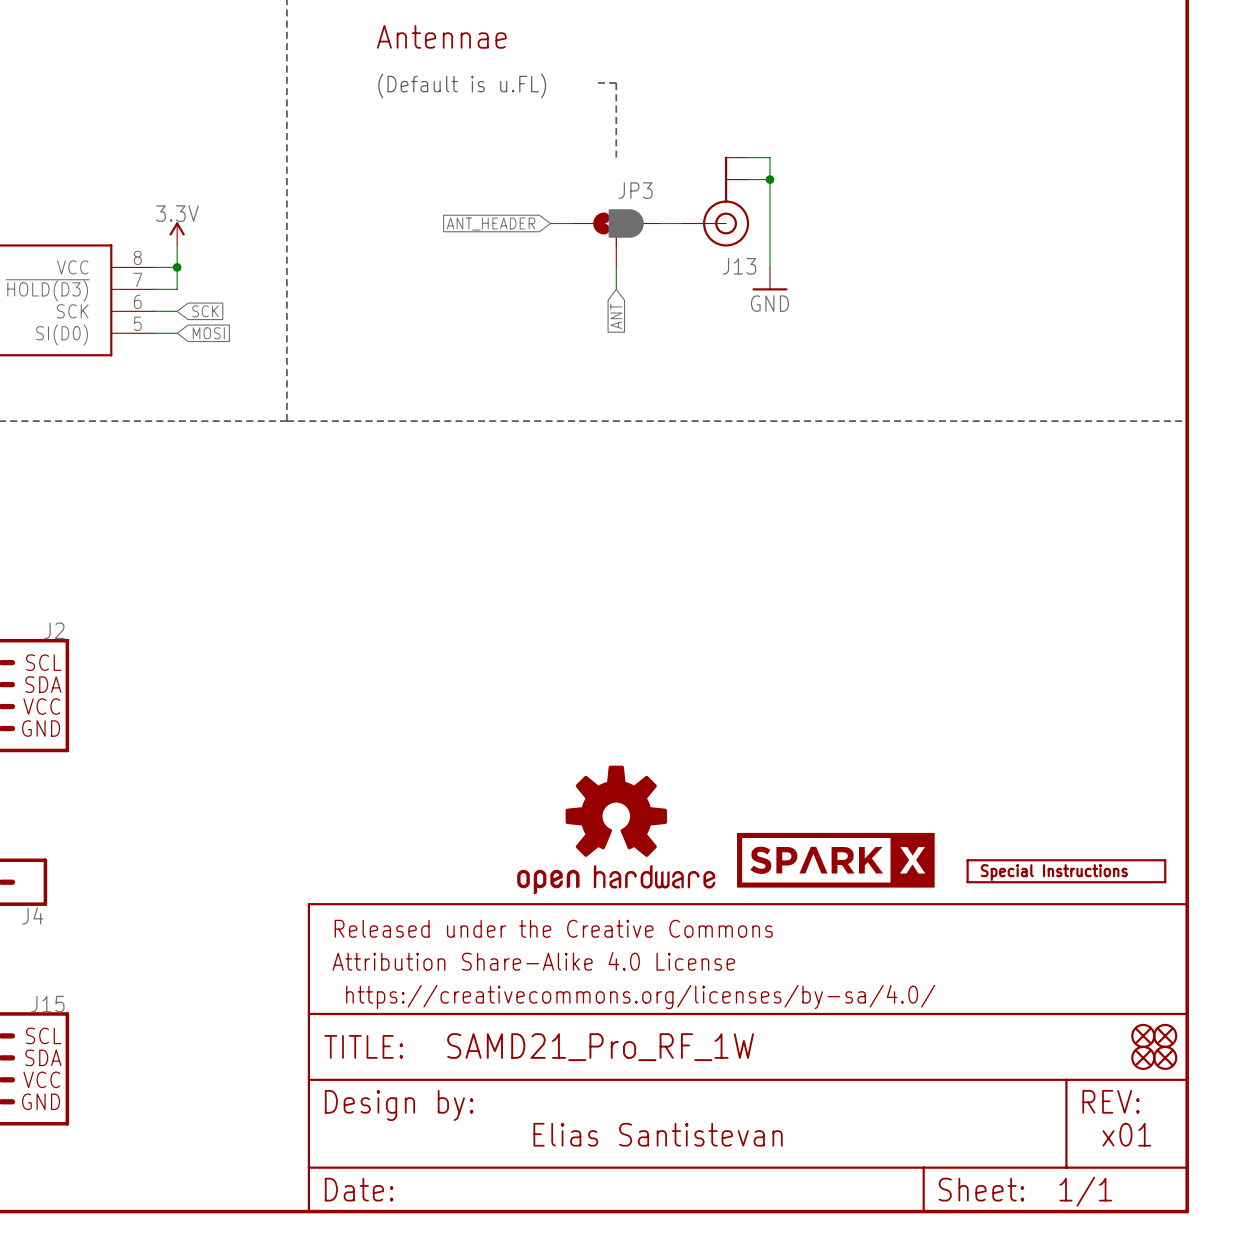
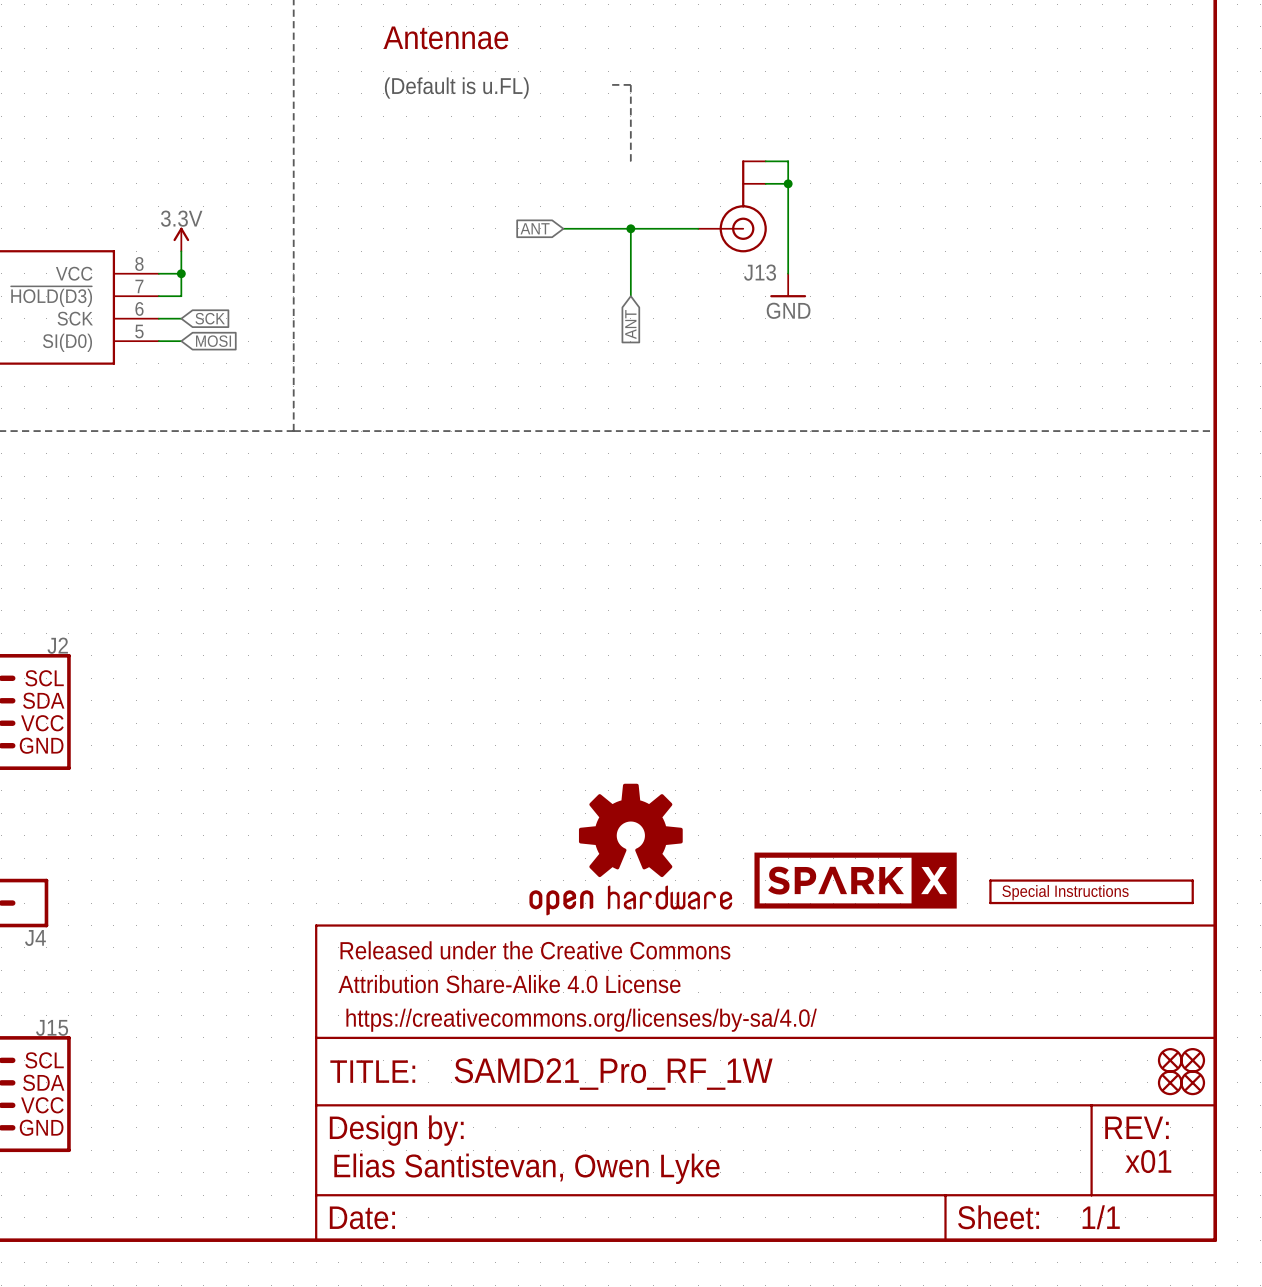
junction: none -> (630, 228)
global label: ANT_HEADER (491, 224) -> ANT (535, 228)
JP3: (616, 238) -> none
text: Elias Santistevan (658, 1134) -> Elias Santistevan, Owen Lyke (526, 1168)

